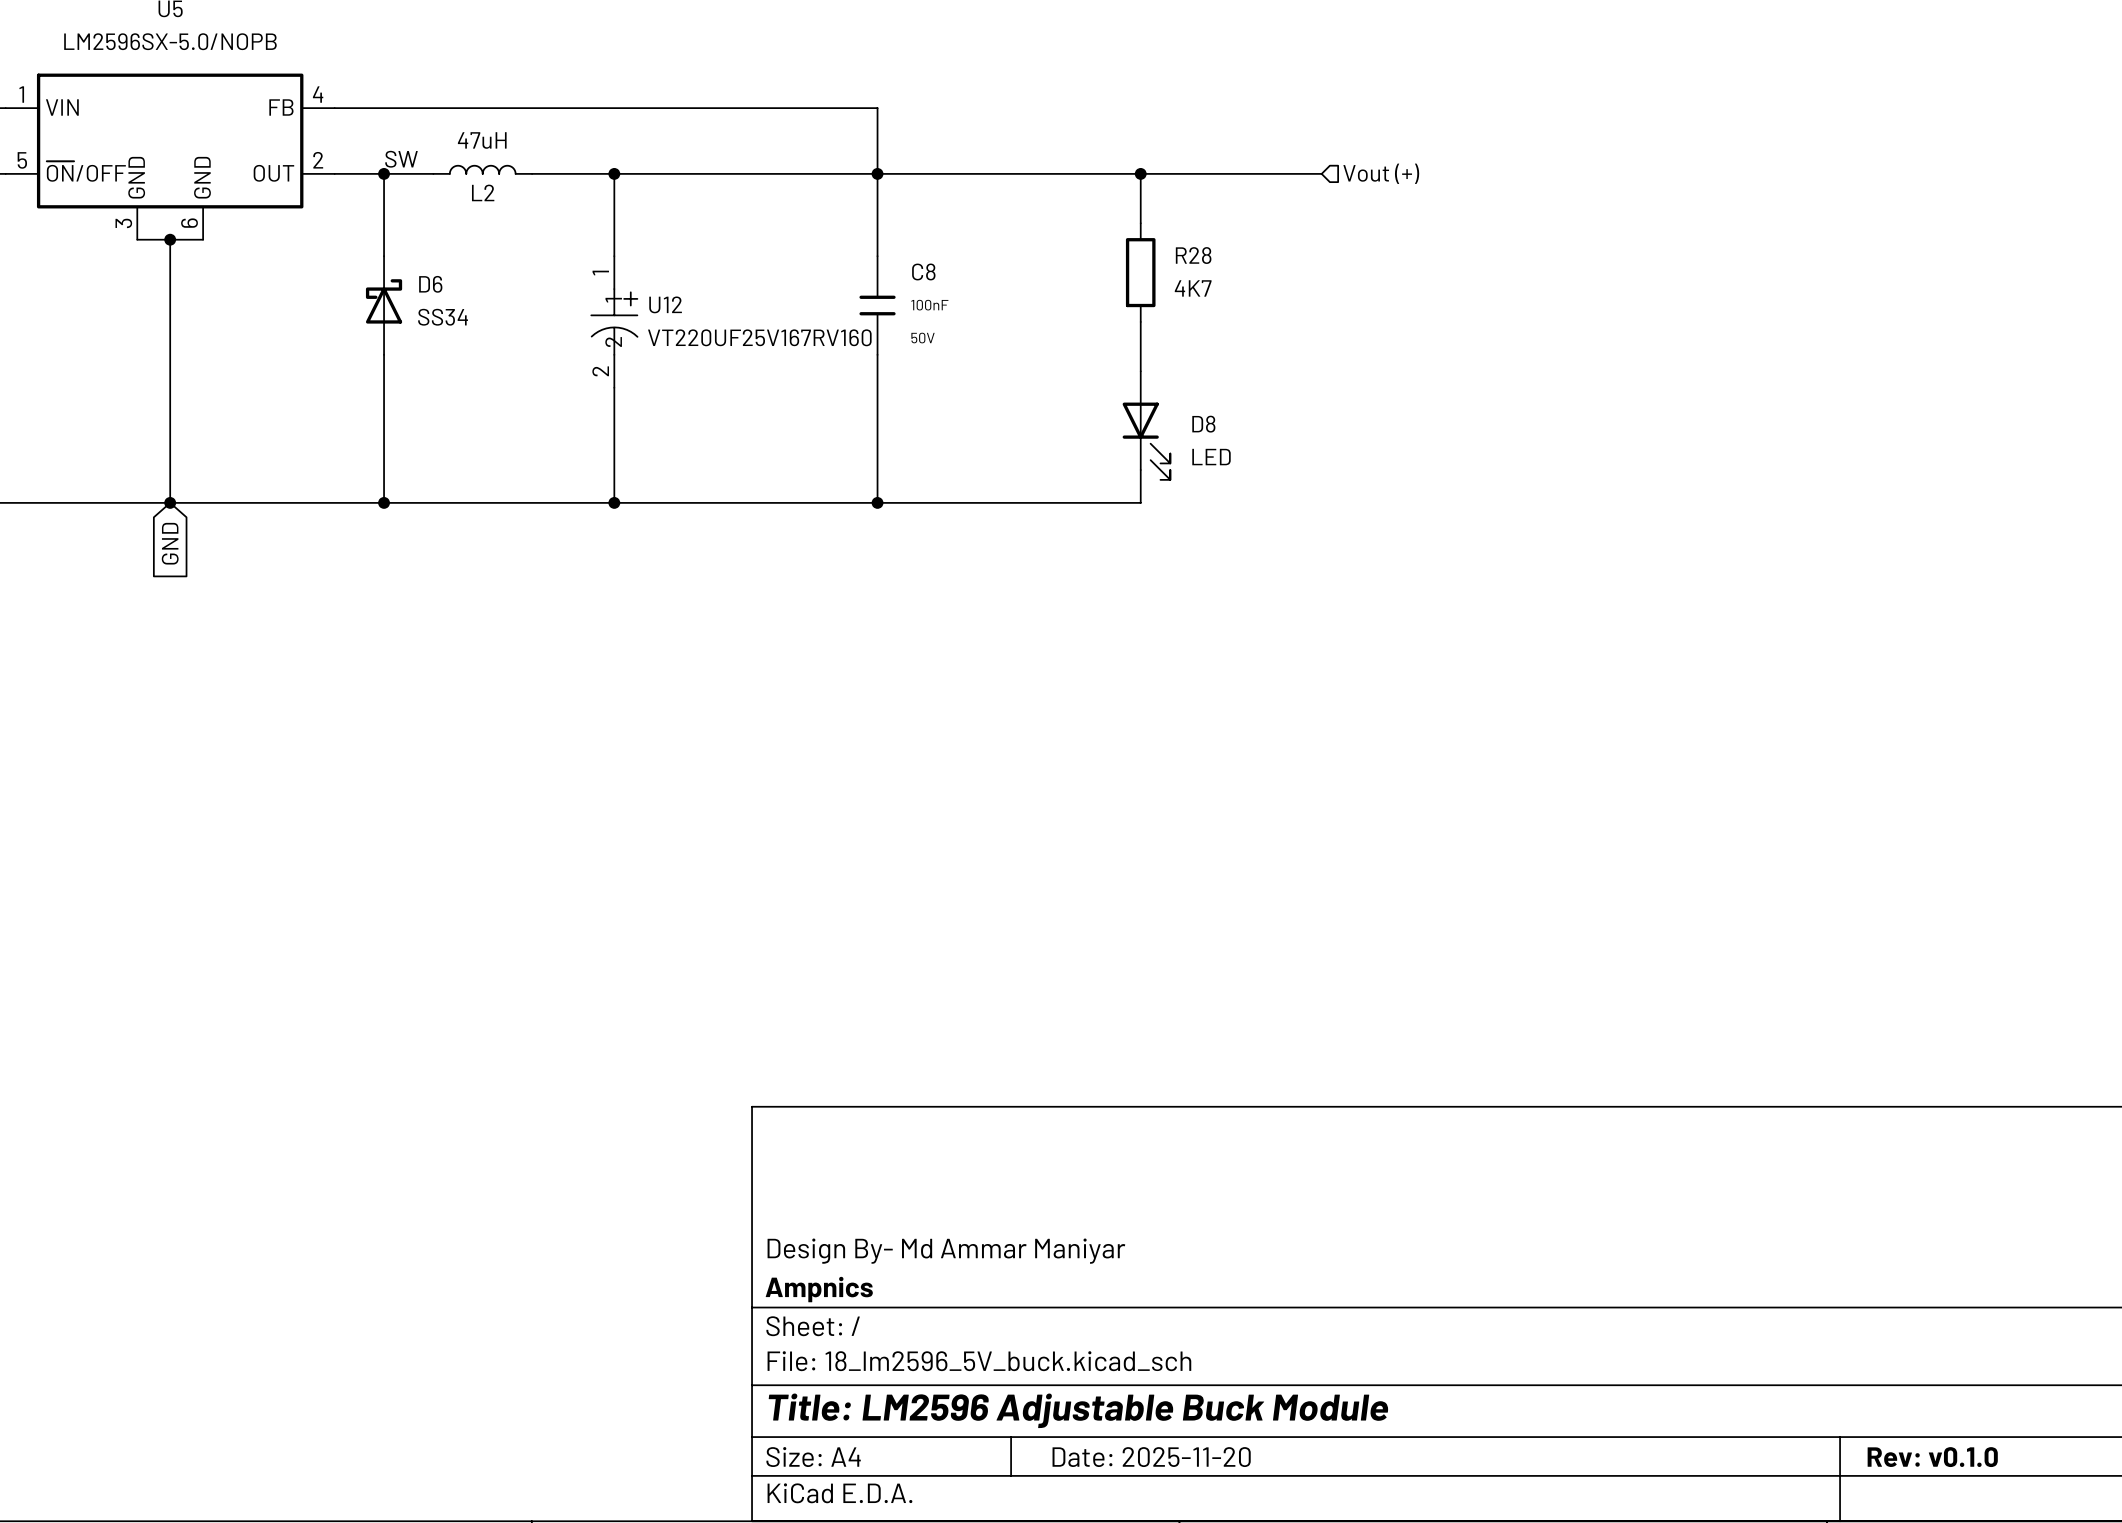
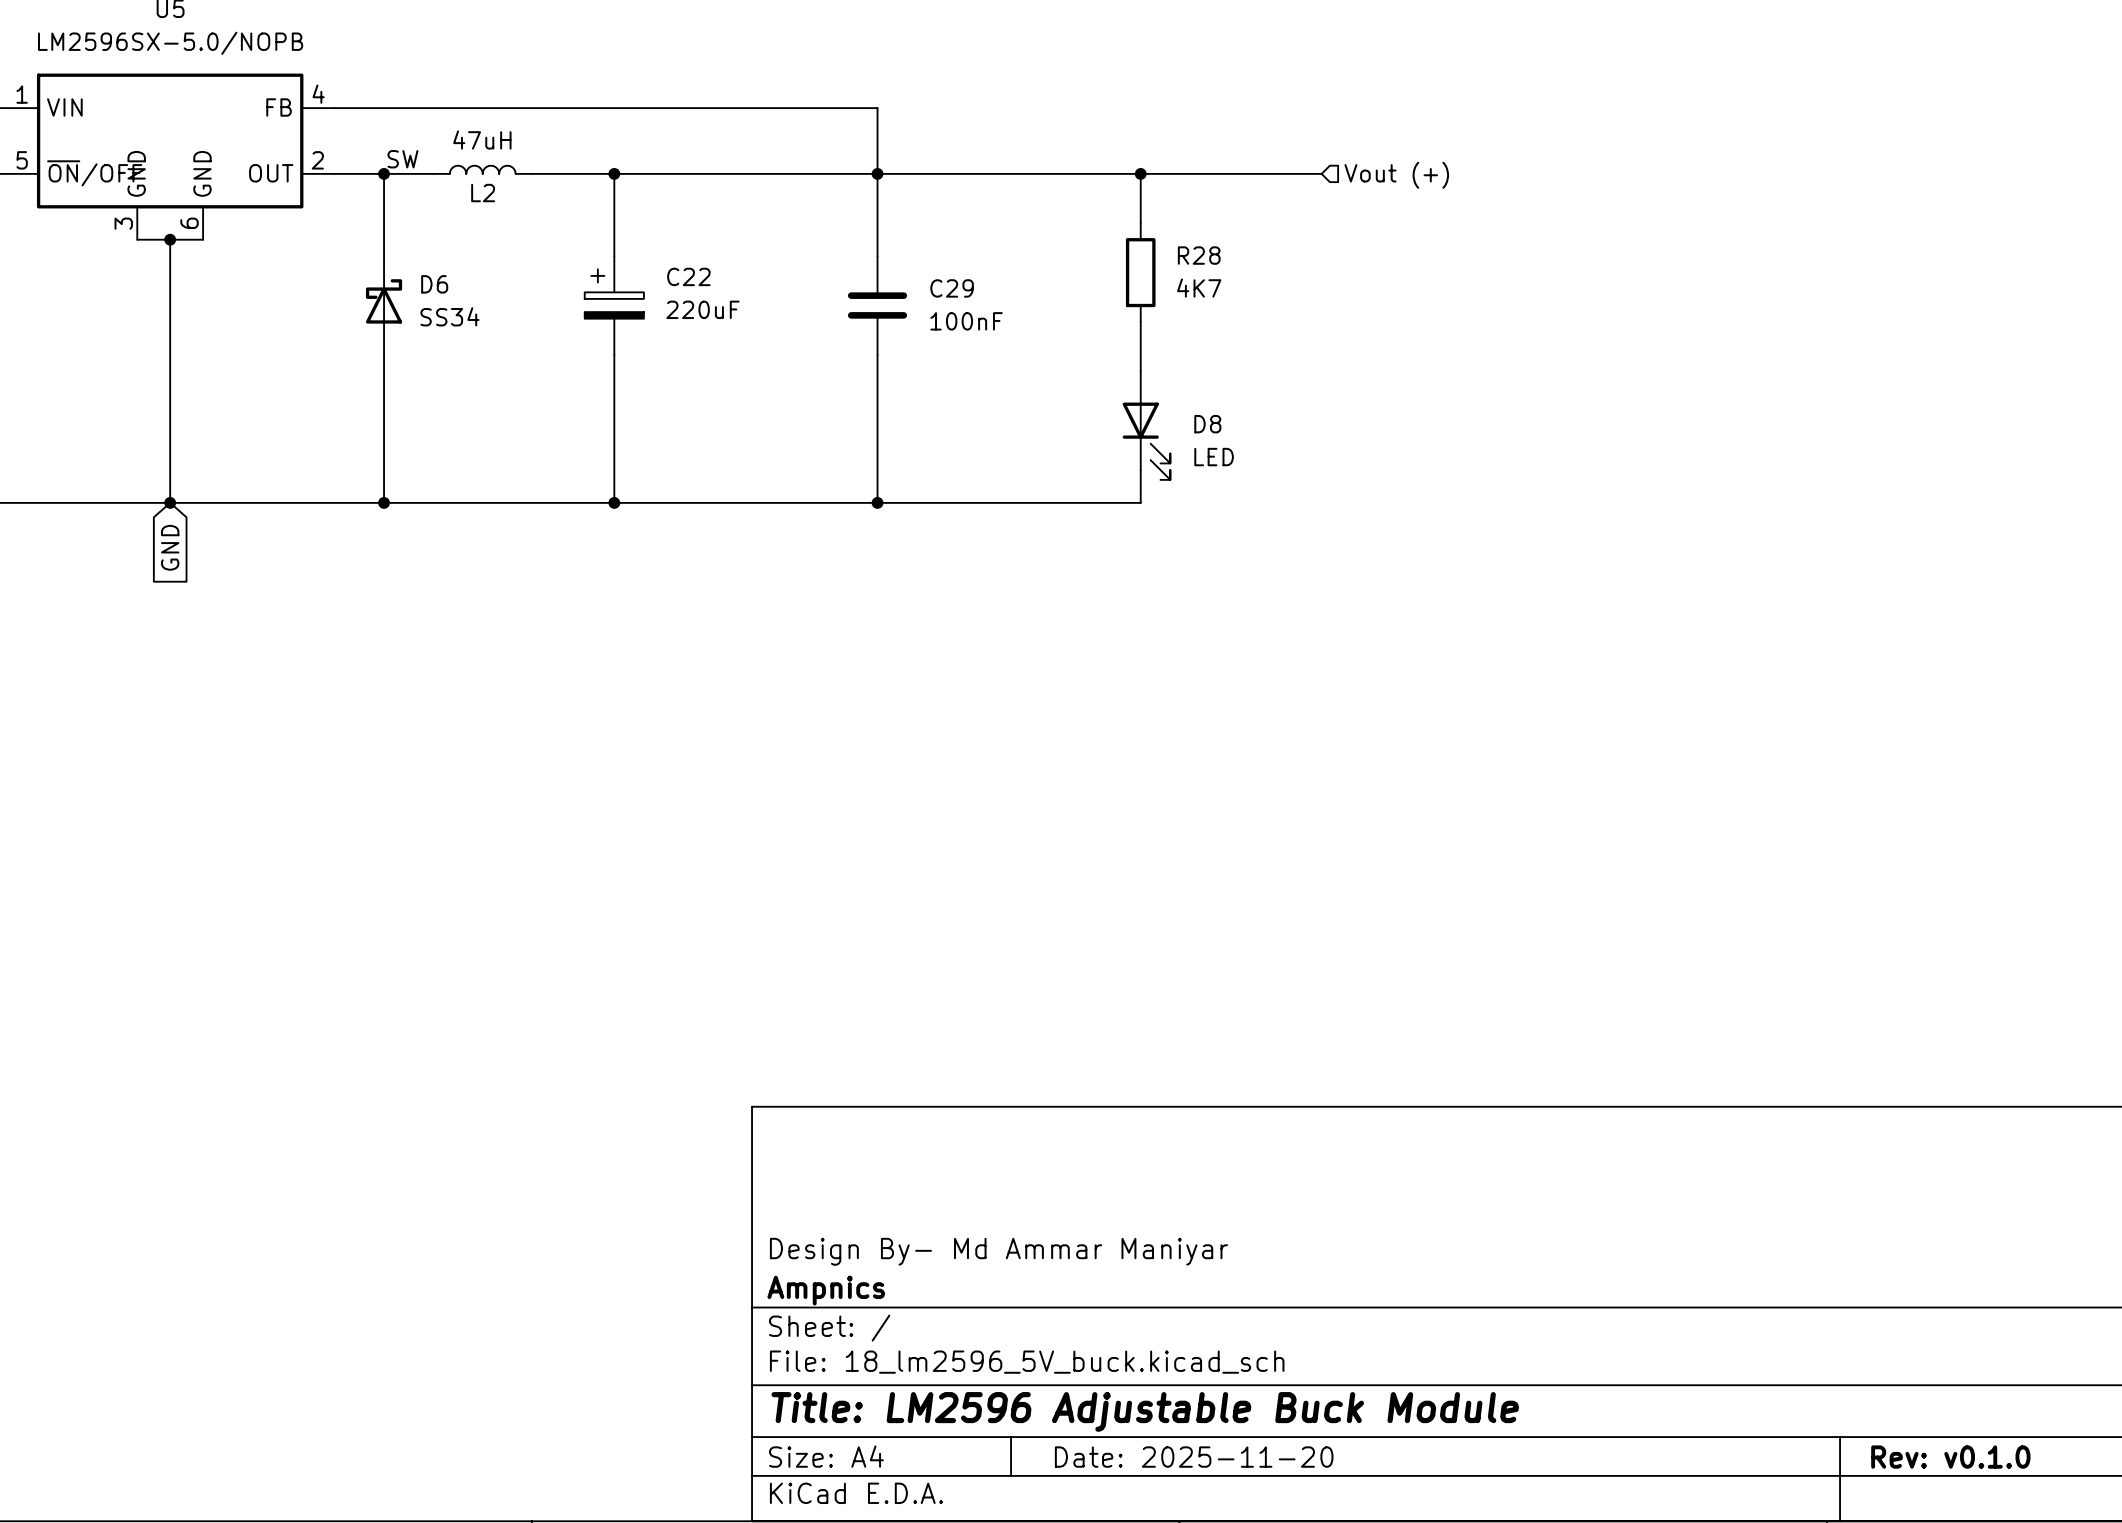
C22: none -> 220uF (614, 305)
C8: 100nF (877, 305) -> none
C29: none -> 100nF (877, 305)
U12: VT220UF25V167RV160 (614, 321) -> none

